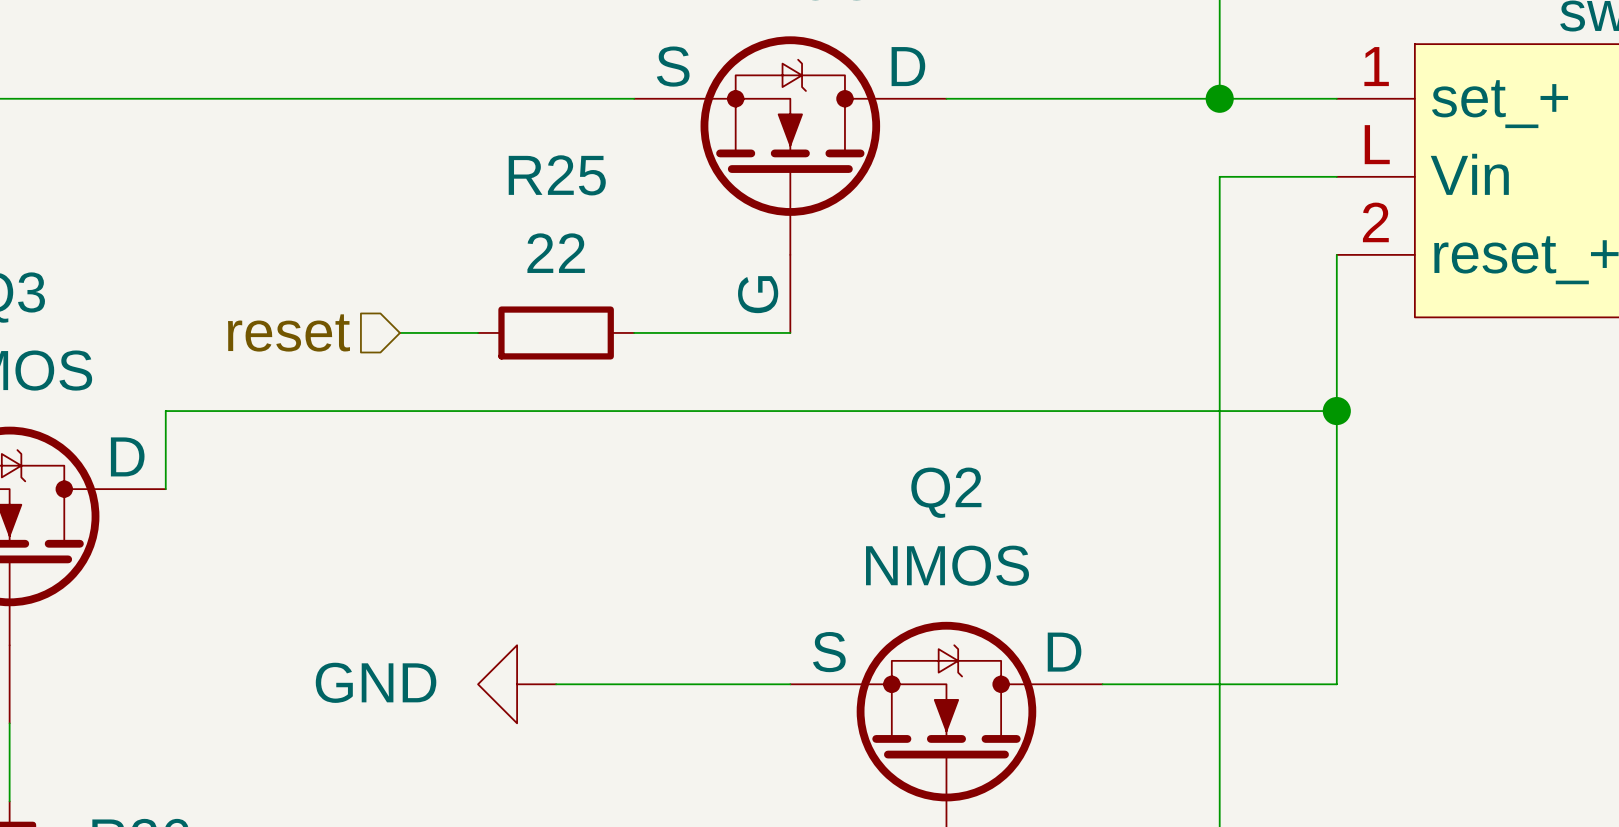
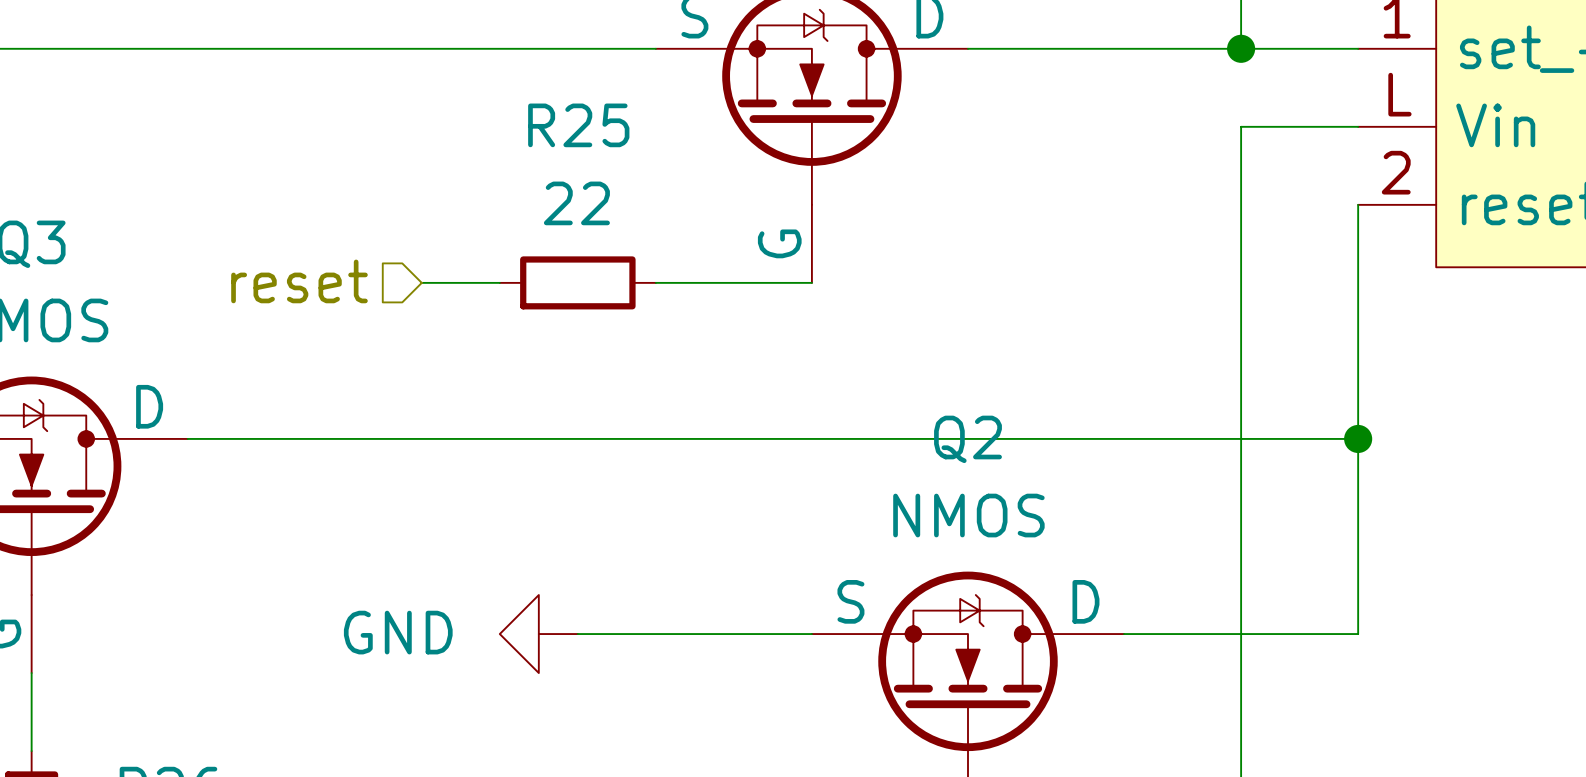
wire: (1336, 411) (165, 411) (165, 489) -> (1358, 438) (187, 438)
junction position: (1336, 411) -> (1358, 438)

